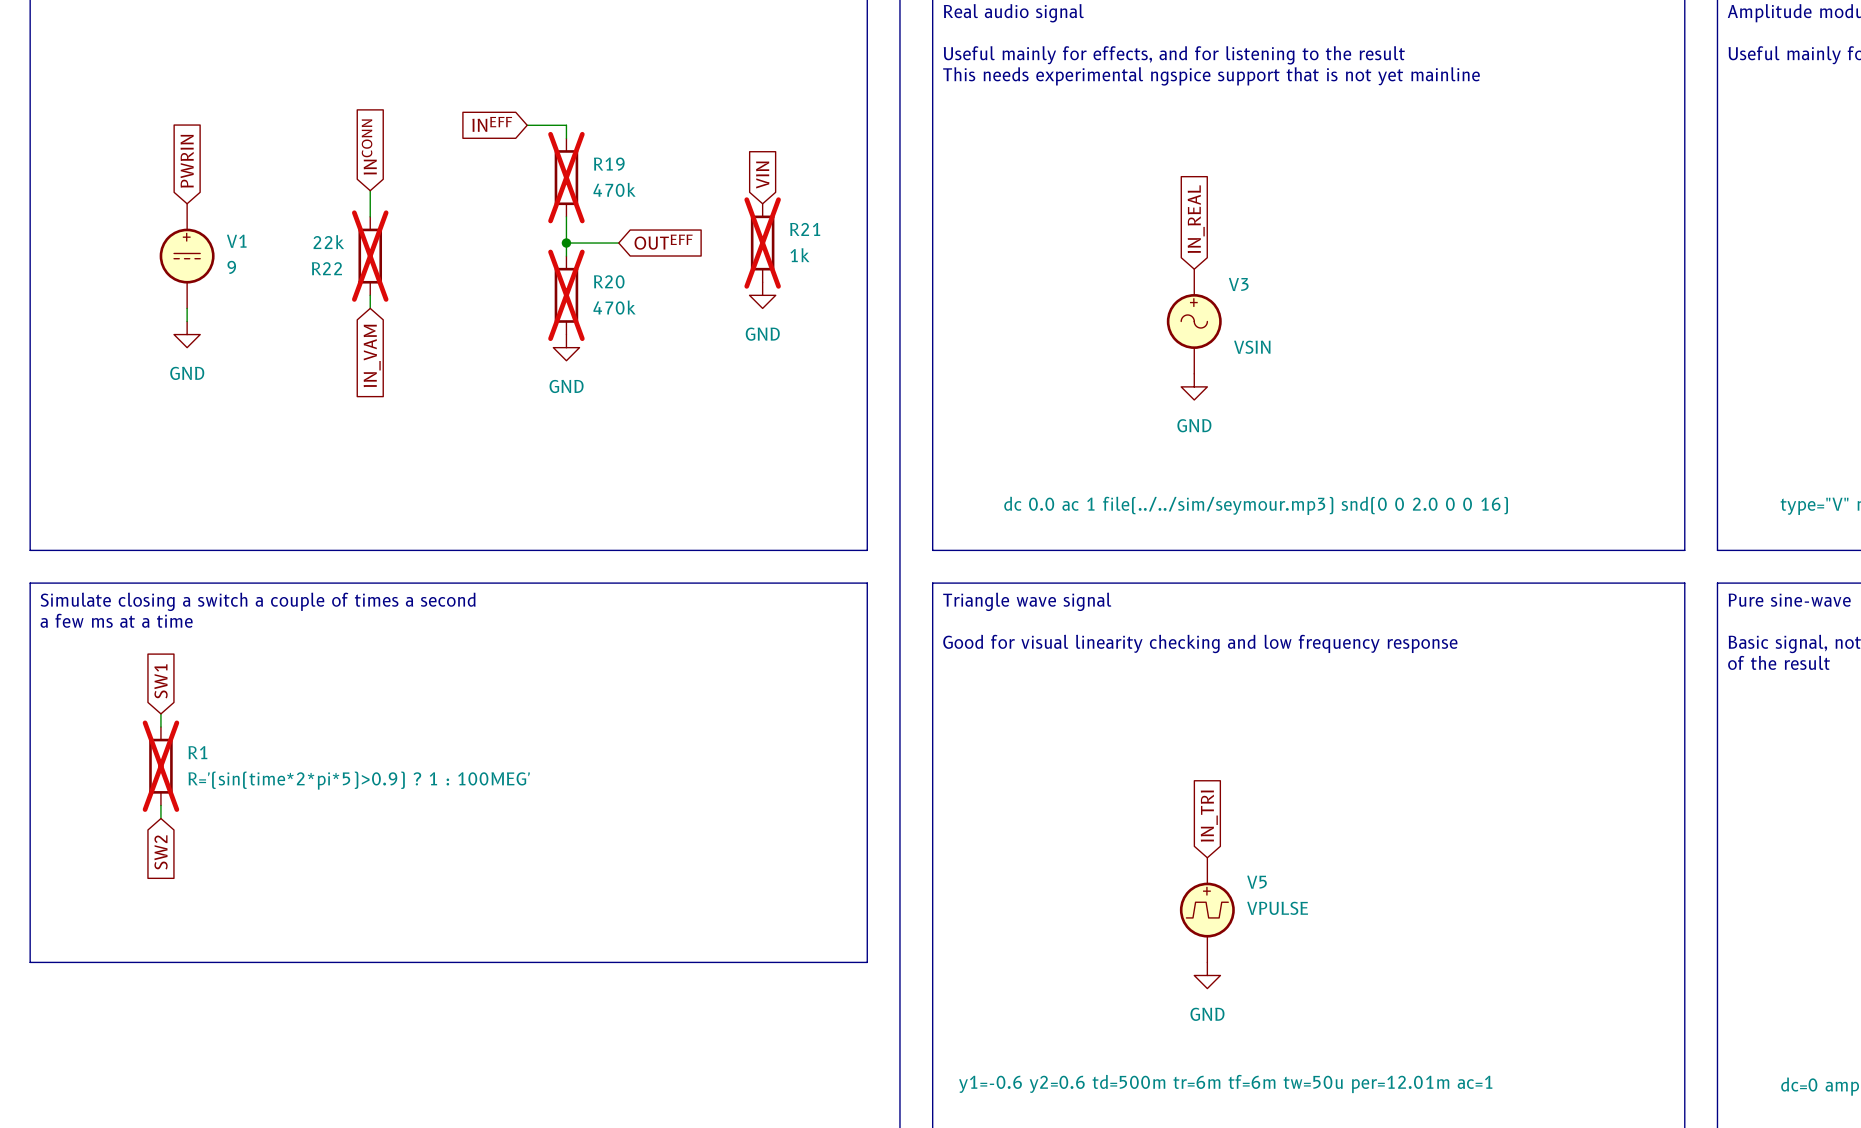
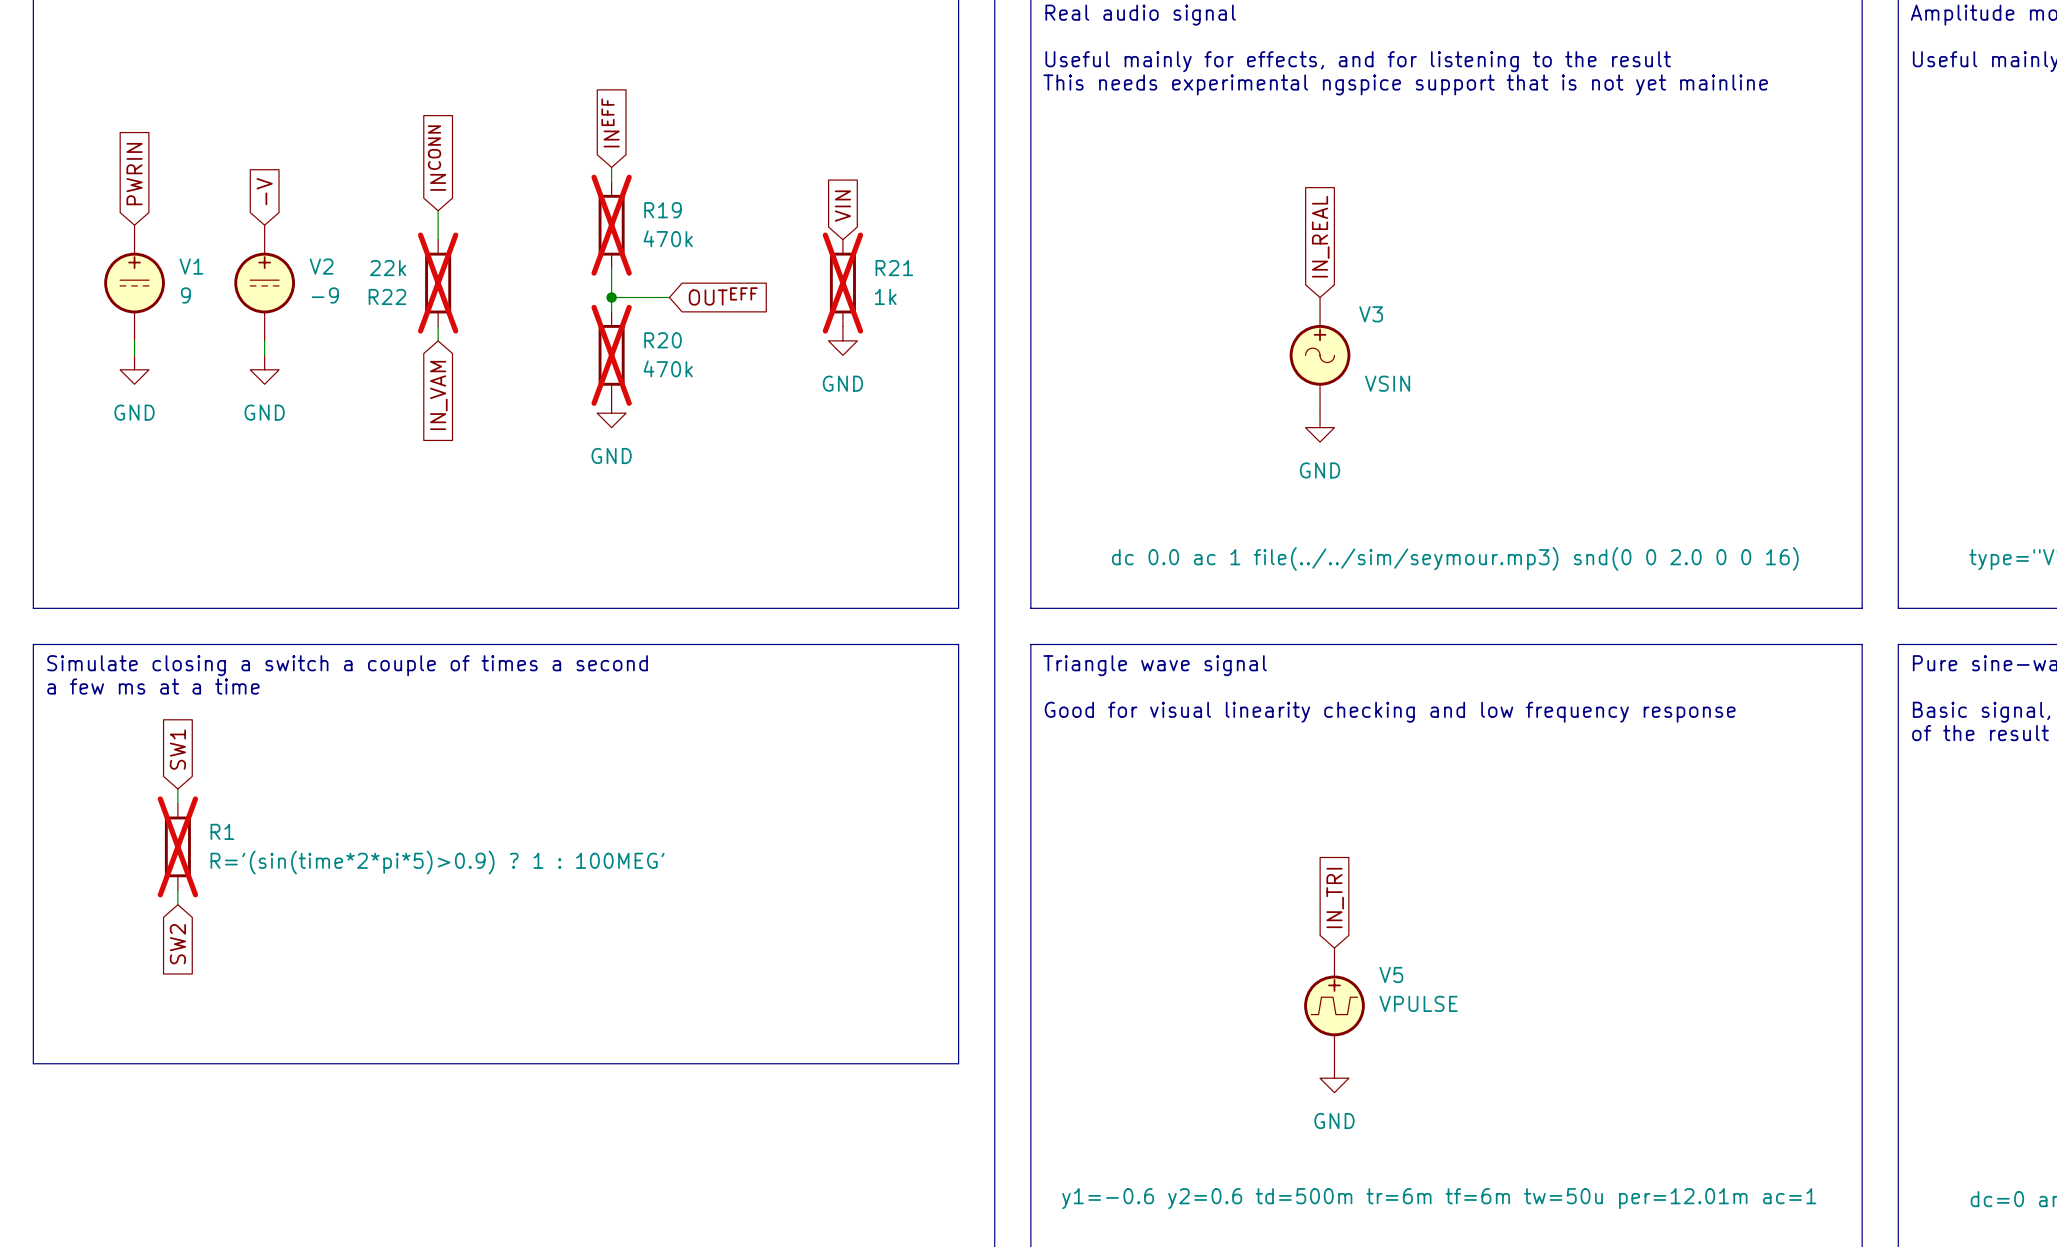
global label rotation: 0° (492, 124) -> 90° clockwise (610, 122)
wire: (527, 125) (566, 125) (566, 138) -> none
global label position: INCONN (369, 146) -> INCONN (437, 158)
wire: none -> (611, 167) (611, 181)
global label position: PWRIN (187, 161) -> PWRIN (134, 174)
global label position: VIN (762, 175) -> VIN (842, 206)
R19 position: (566, 177) -> (611, 225)
global label: none -> -V (264, 191)
wire: (370, 190) (370, 216) -> (438, 210) (438, 239)
wire: (566, 216) (566, 256) -> (611, 268) (611, 311)
global label position: OUTEFF (663, 242) -> OUTEFF (723, 296)
wire: (566, 243) (618, 243) -> (611, 297) (669, 297)
junction position: (566, 243) -> (611, 297)
R21 position: (762, 243) -> (842, 283)
V1 position: (187, 256) -> (134, 283)
V2: none -> -9 (264, 283)
R22 position: (370, 256) -> (438, 283)
wire: (370, 295) (370, 308) -> (438, 326) (438, 340)
R20 position: (566, 295) -> (611, 355)
power symbol position: GND (762, 295) -> GND (842, 340)
wire: none -> (134, 340) (134, 355)
wire: (187, 308) (187, 321) -> (264, 340) (264, 355)
power symbol: none -> GND (134, 369)
power symbol: GND (187, 334) -> none
power symbol: none -> GND (264, 369)
power symbol position: GND (566, 347) -> GND (611, 413)
global label position: IN_VAM (372, 355) -> IN_VAM (438, 395)

